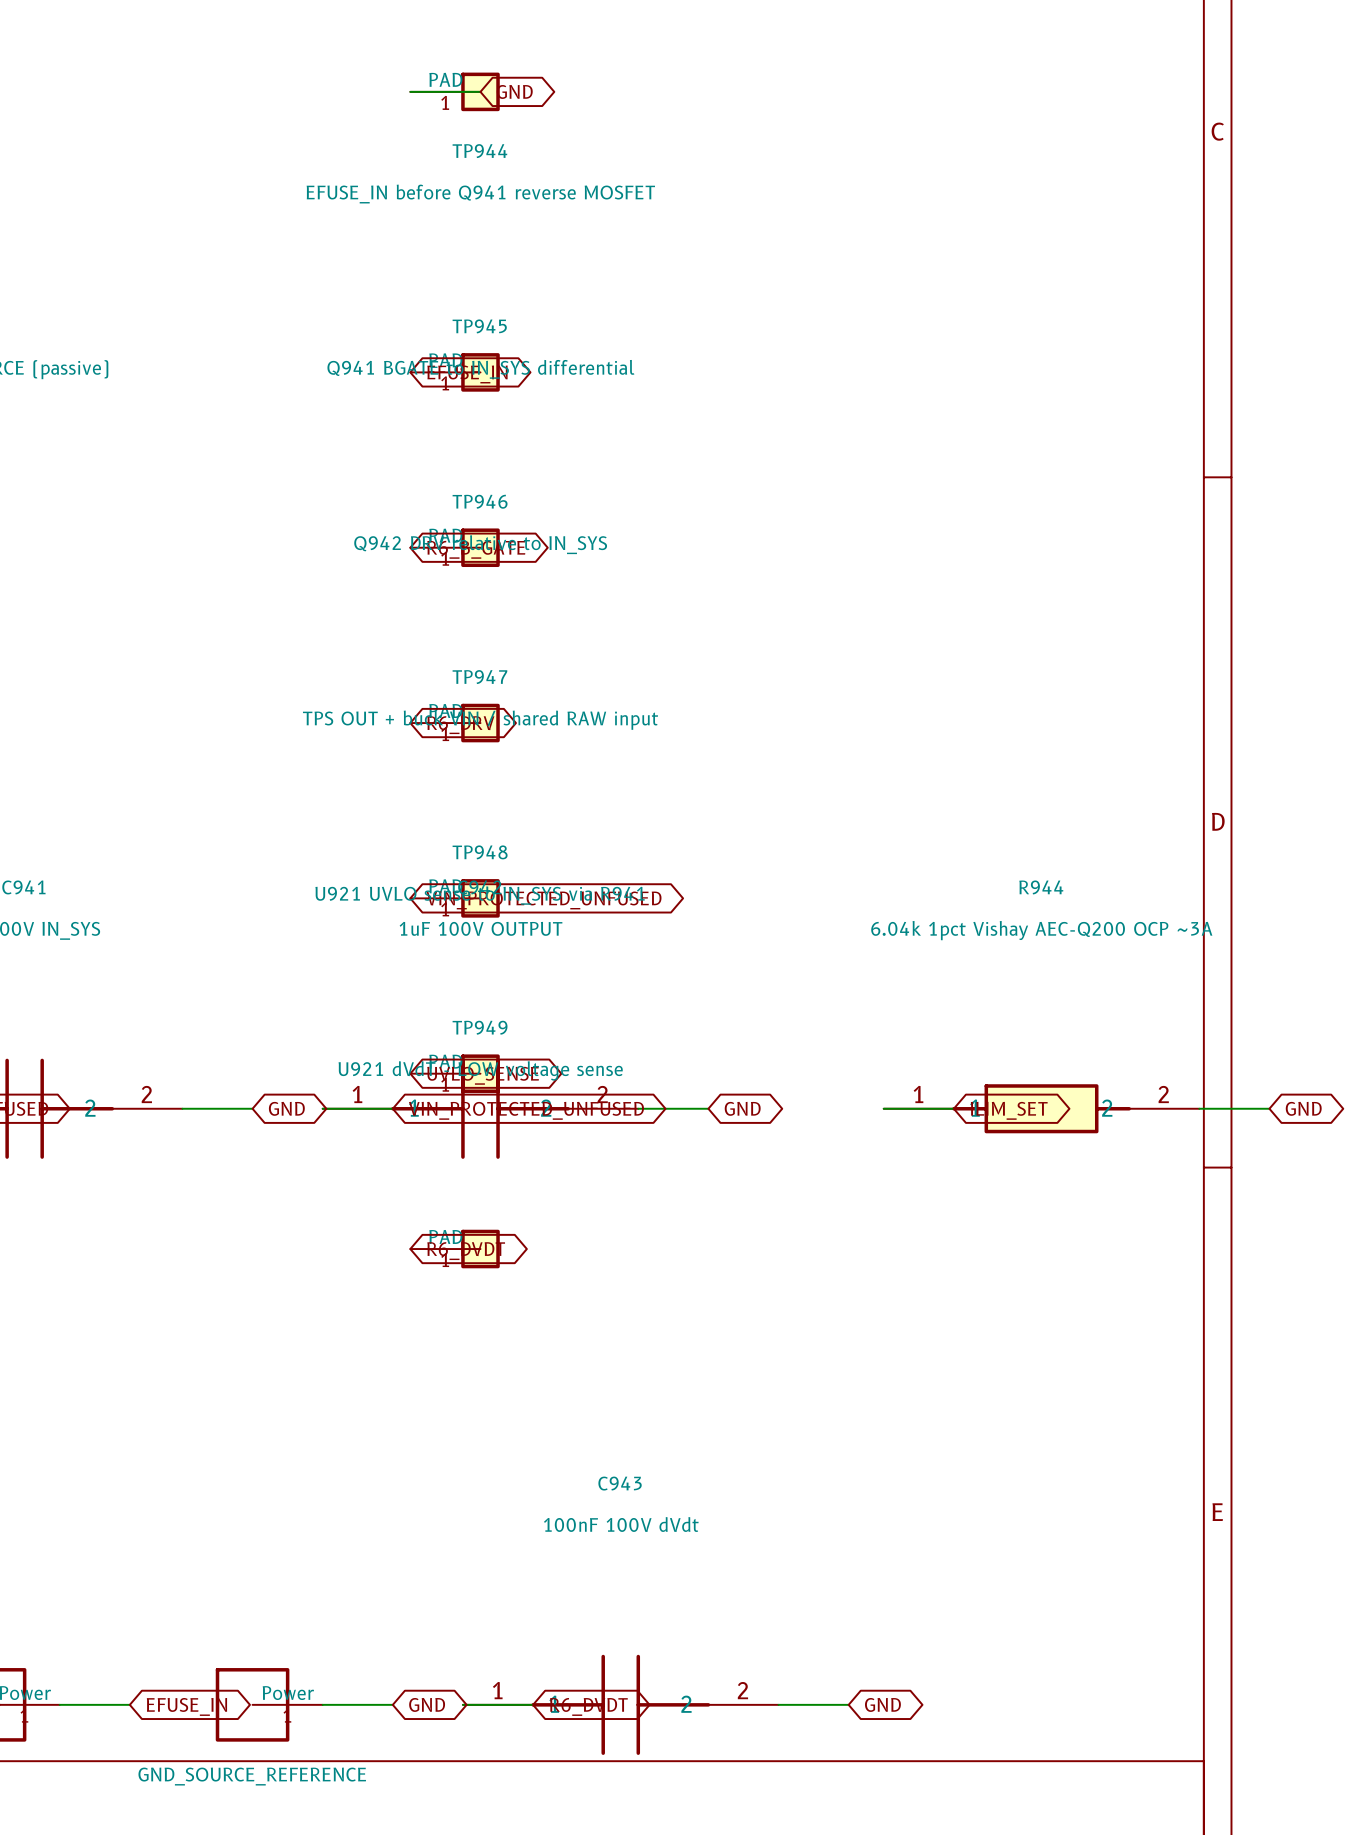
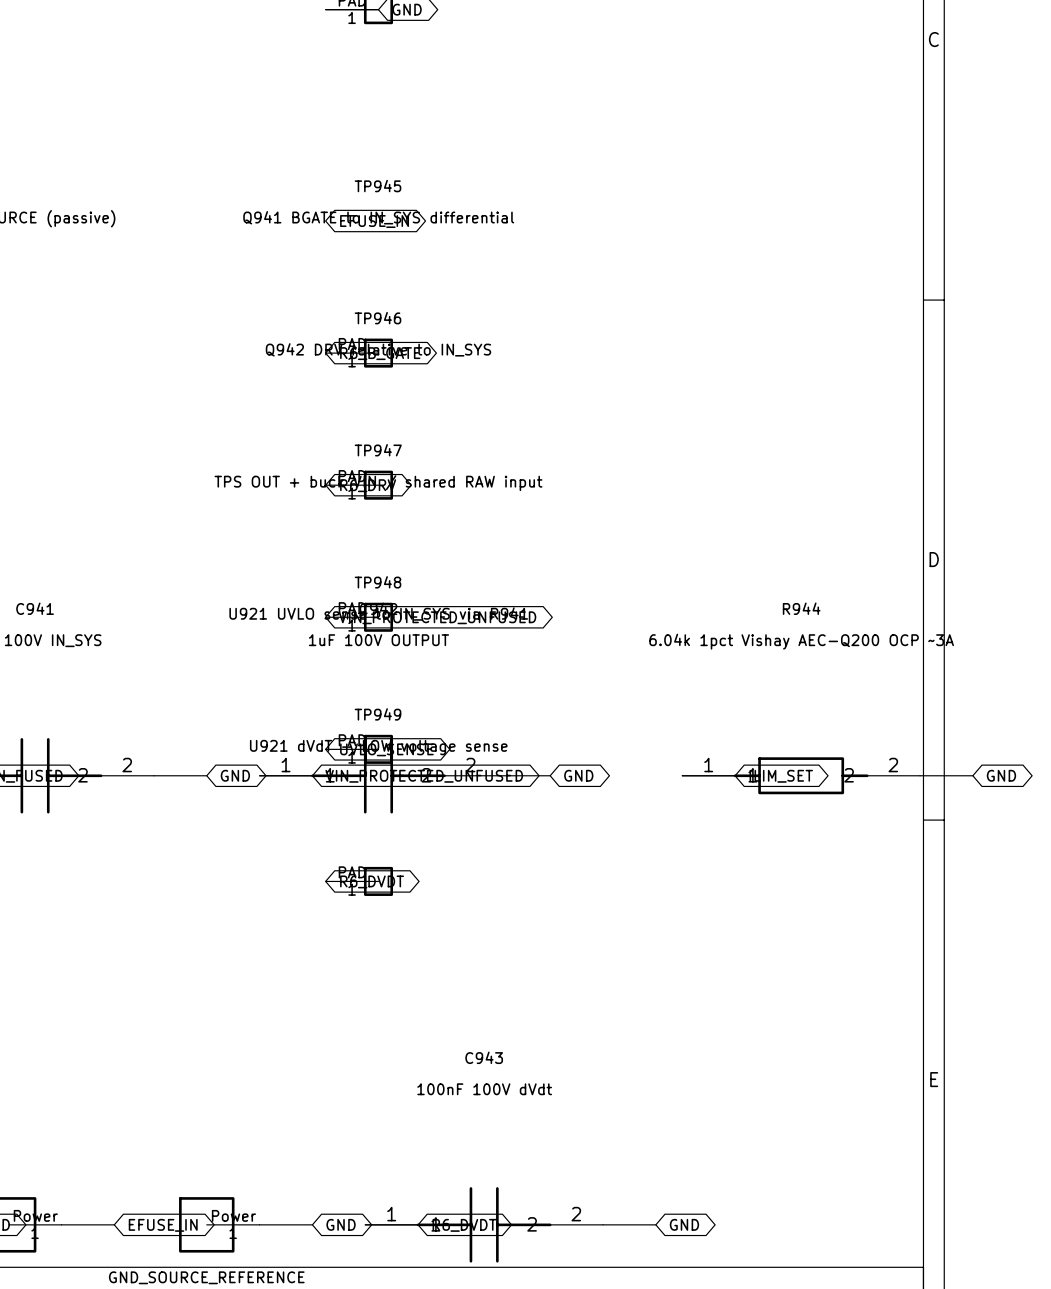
TP944: EFUSE_IN before Q941 reverse MOSFET (455, 372) -> none

